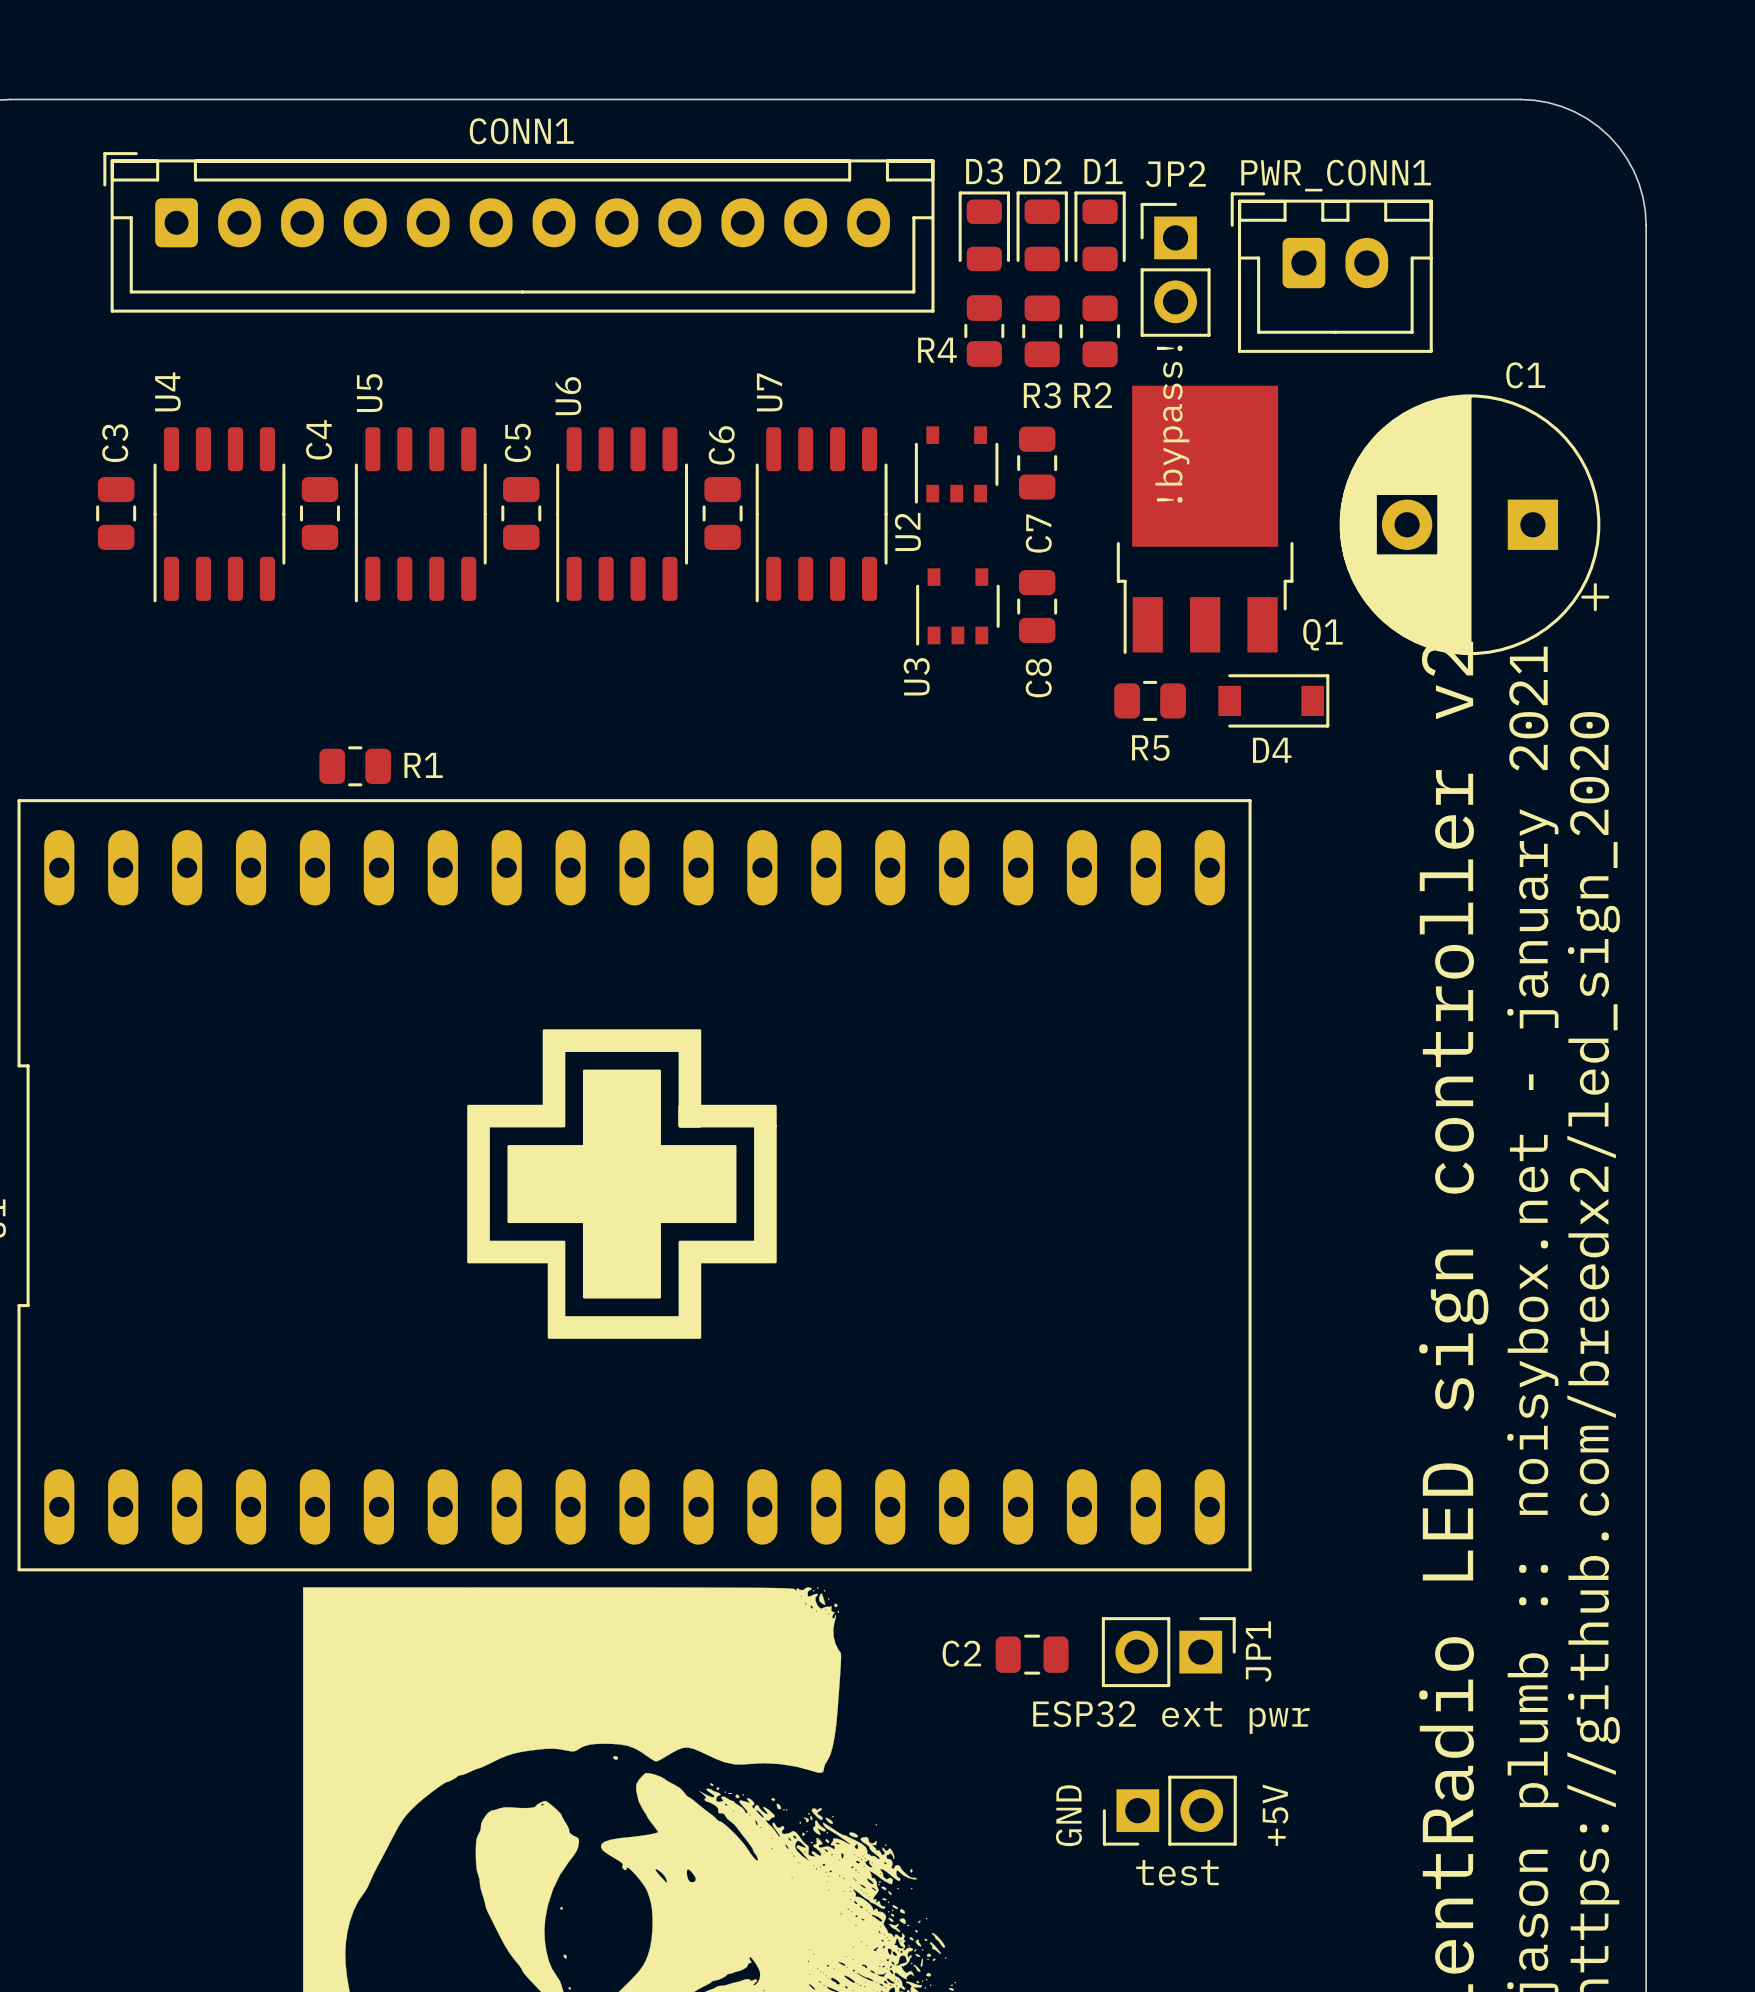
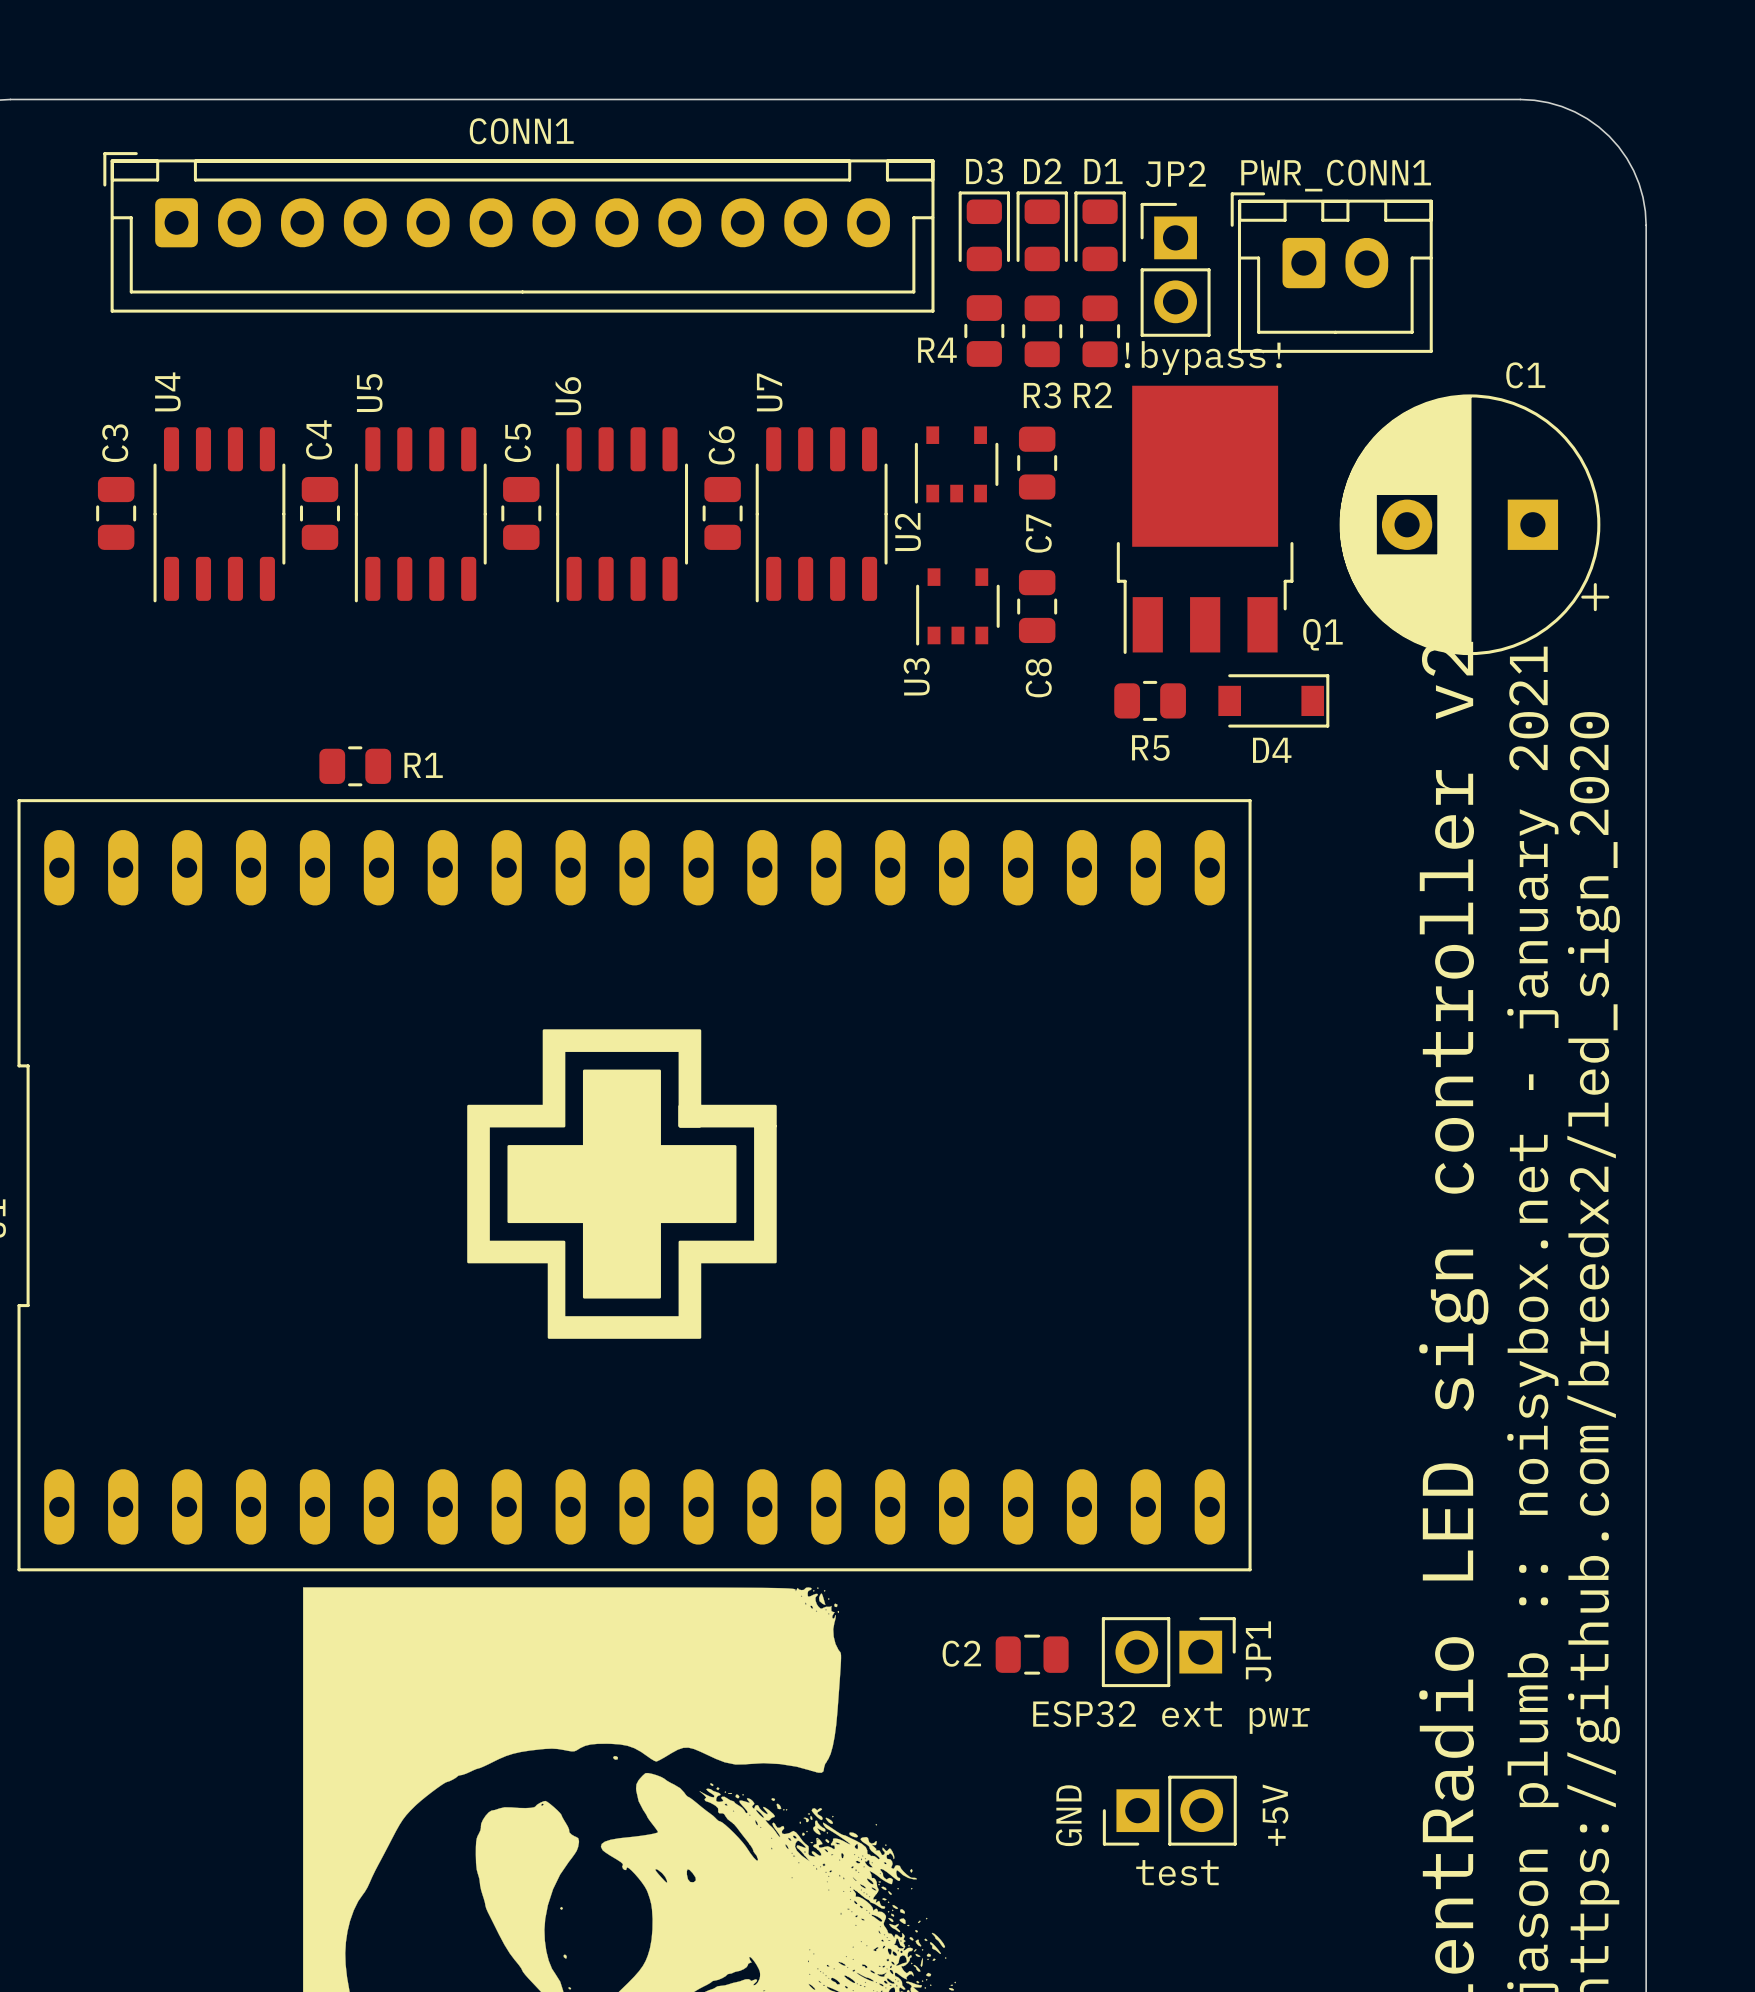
text rotation: 0° (1172, 424) -> 90° clockwise (1203, 358)

